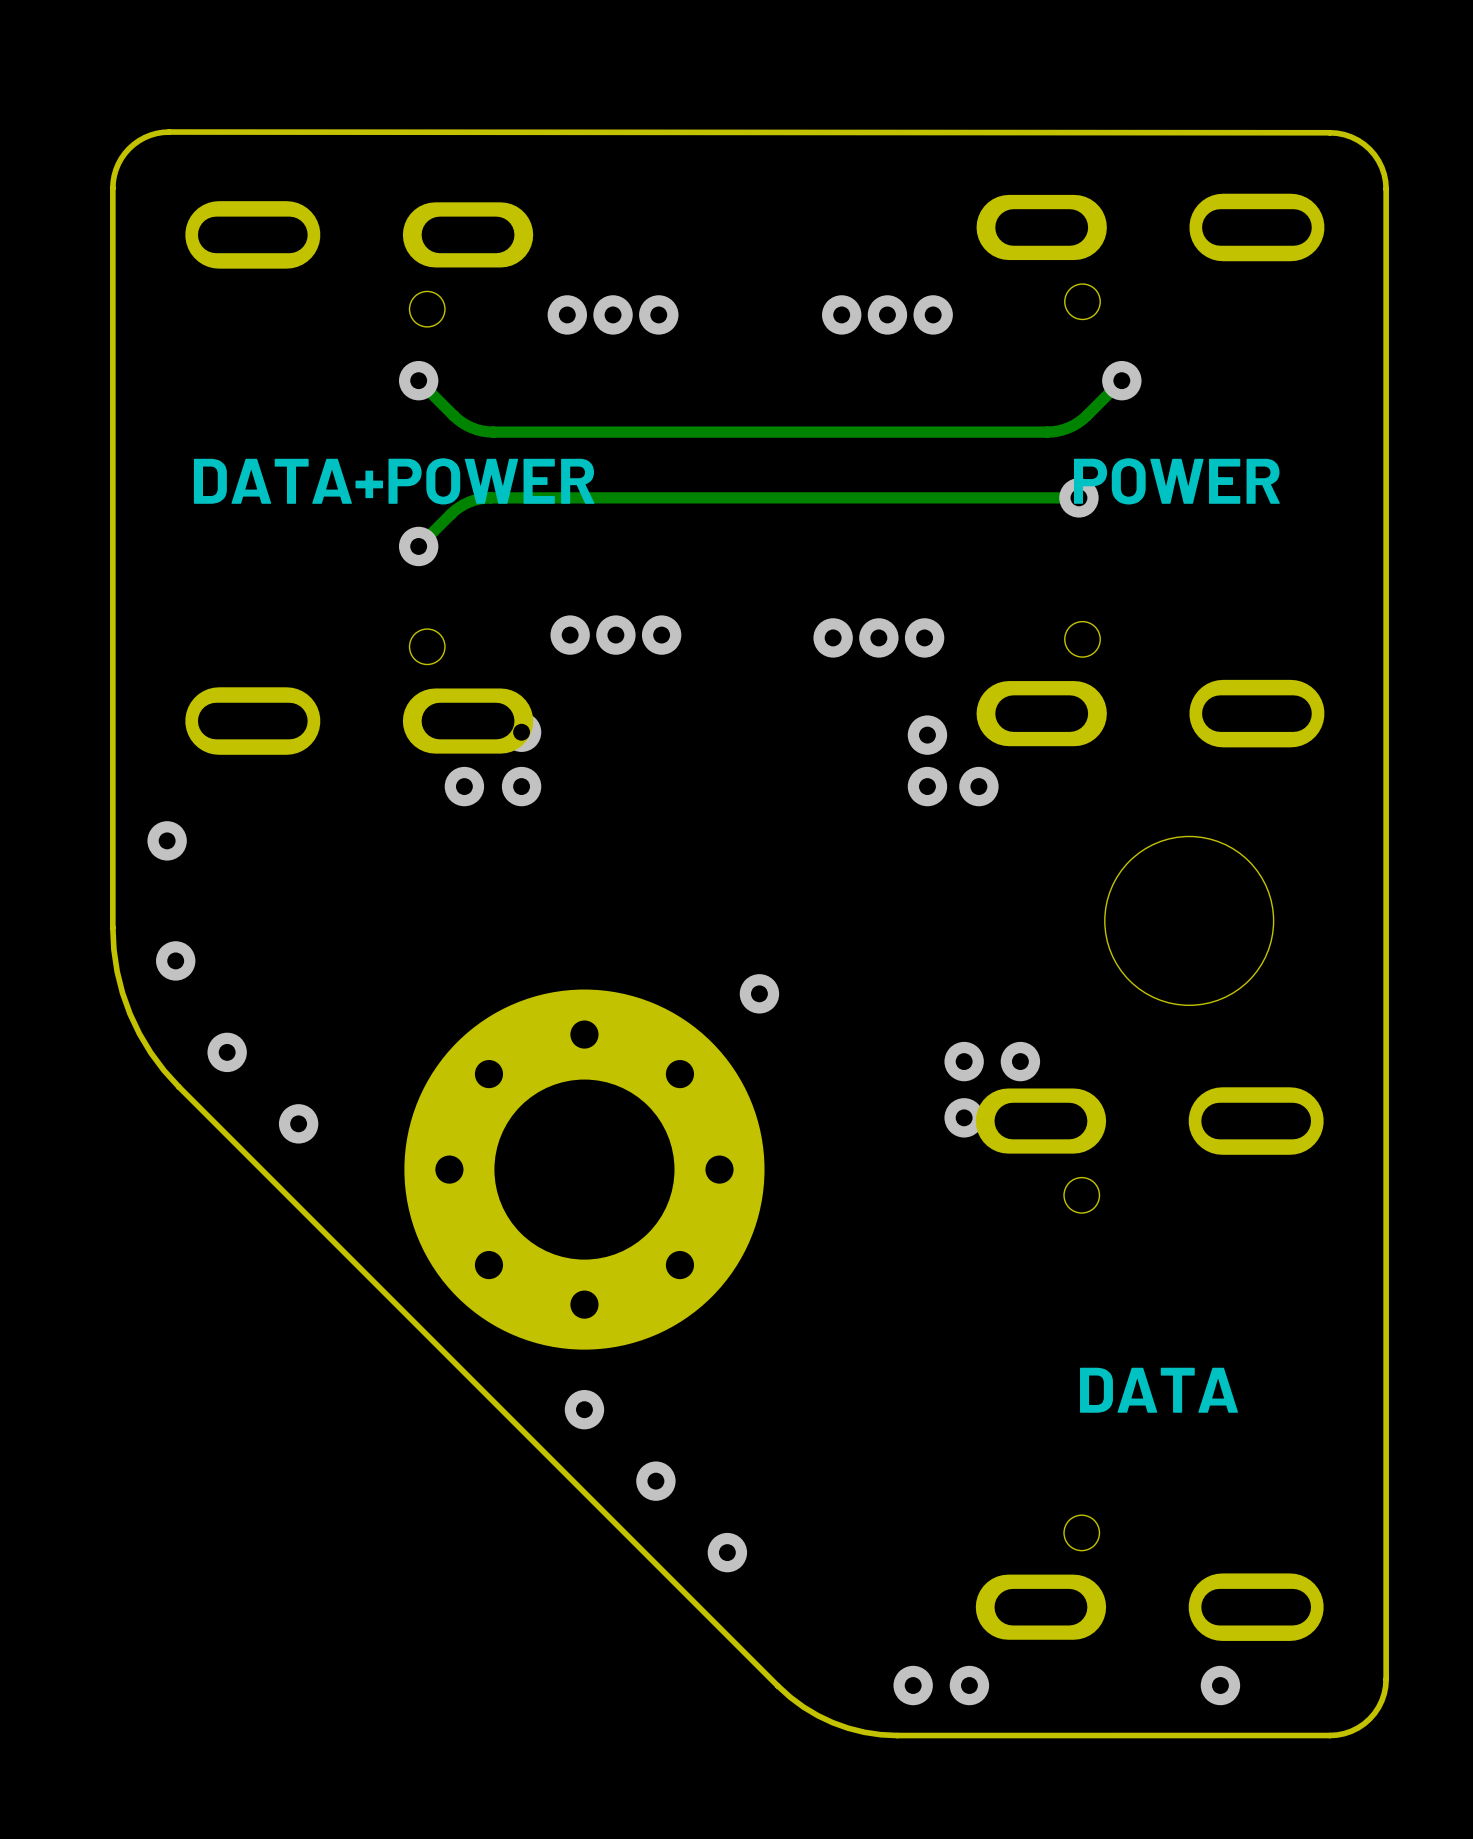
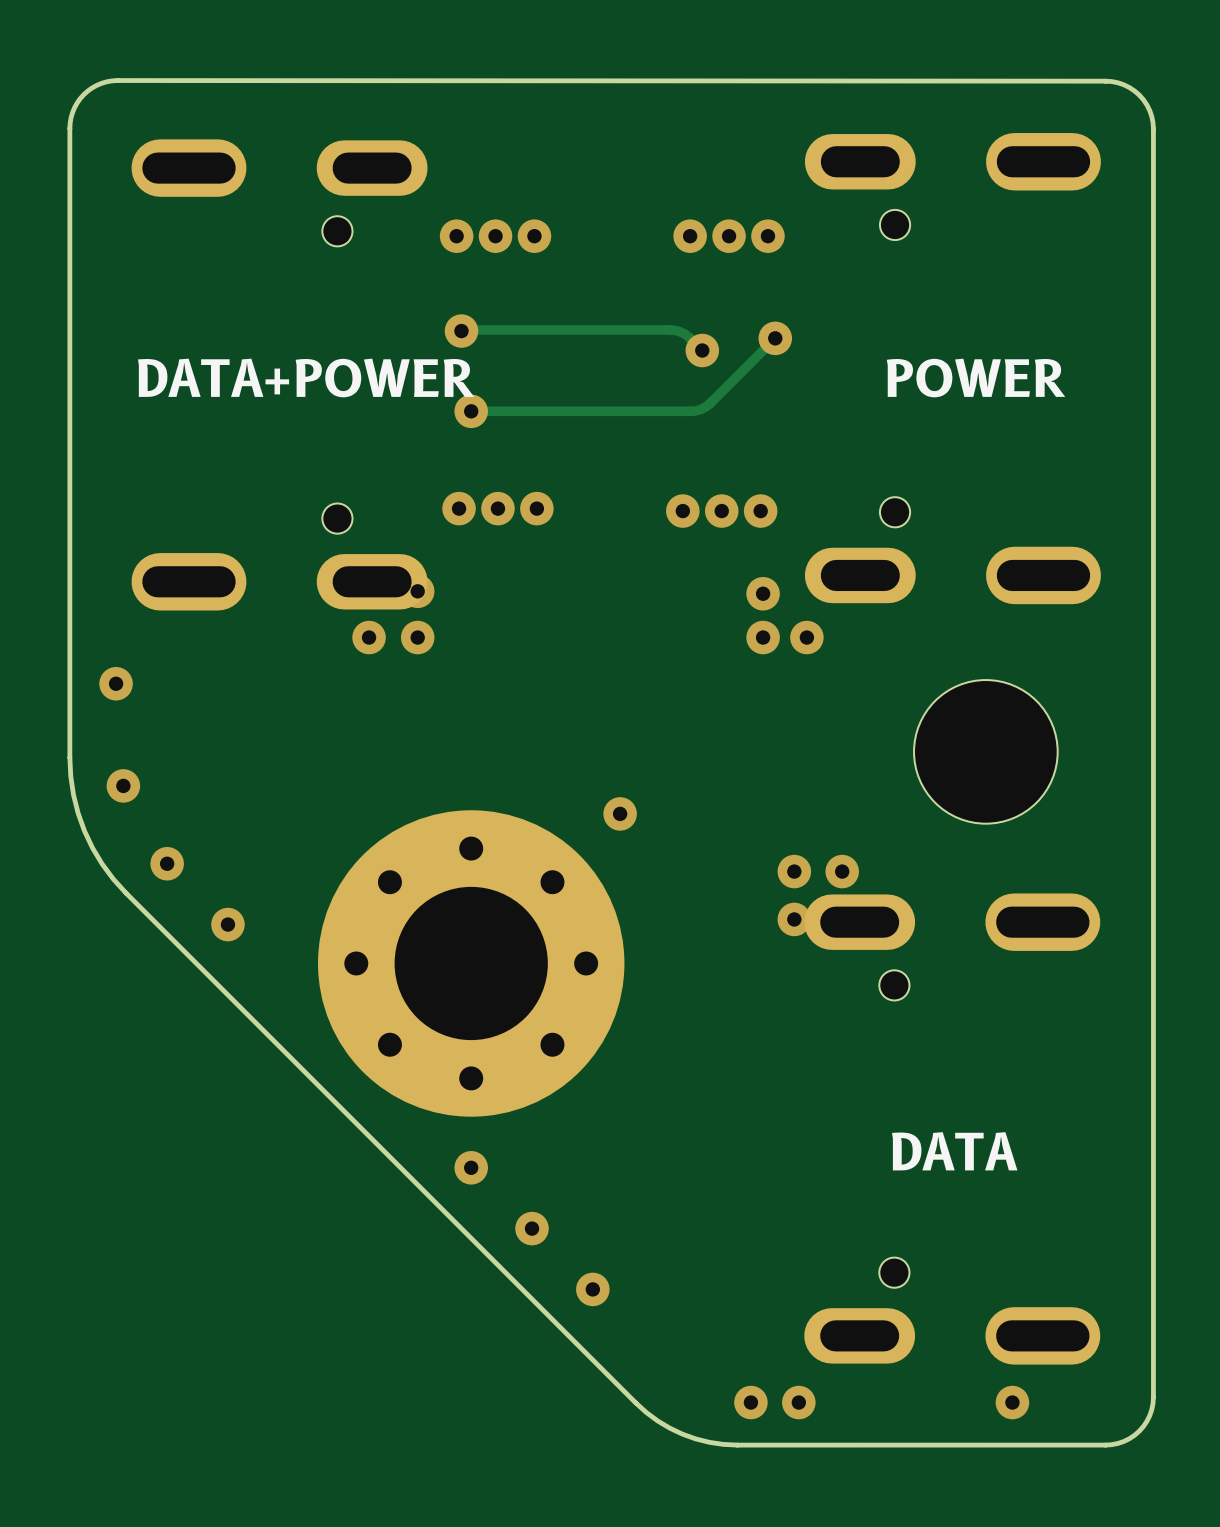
via: (418, 380) -> none
track: (1121, 380) (1078, 422) (1063, 429) (1047, 432) (487, 431) (477, 429) (462, 422) (418, 380) -> none
via: (1121, 380) -> none
track: none -> (461, 331) (672, 330) (685, 334) (702, 350) (692, 350)
via: none -> (461, 331)
track: none -> (775, 338) (710, 402) (696, 410) (471, 411)
via: none -> (775, 338)
via: none -> (702, 350)
track: (1078, 497) (485, 498) (474, 500) (459, 507) (418, 546) -> none
via: (1078, 497) -> none
via: none -> (471, 411)
via: (418, 546) -> none

